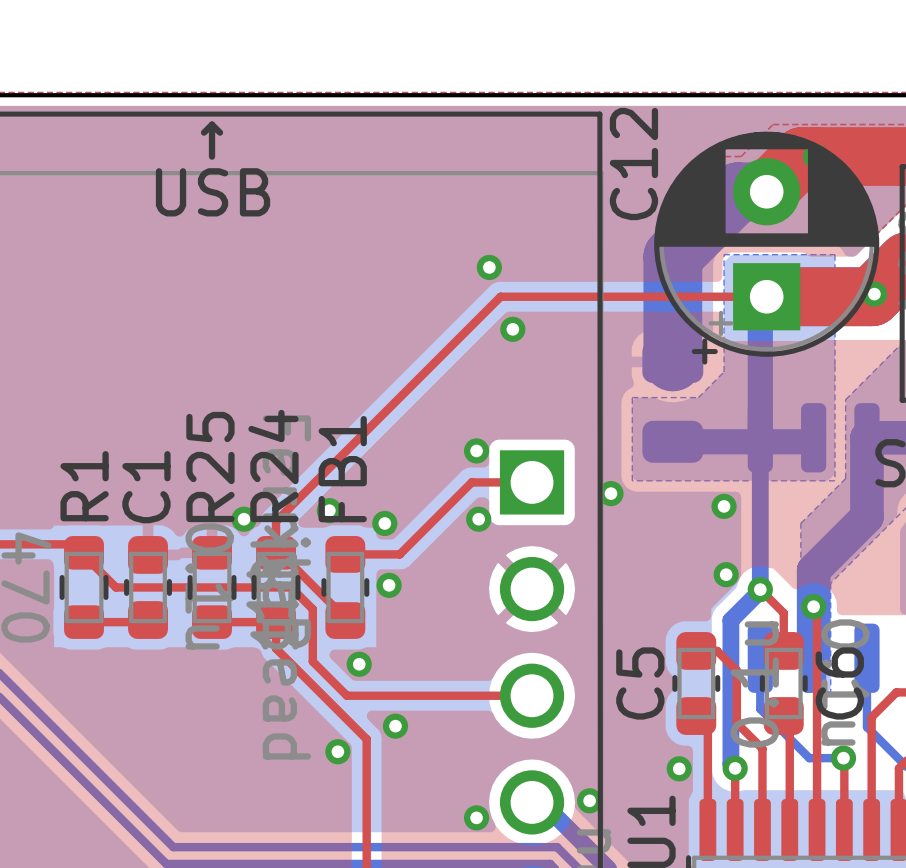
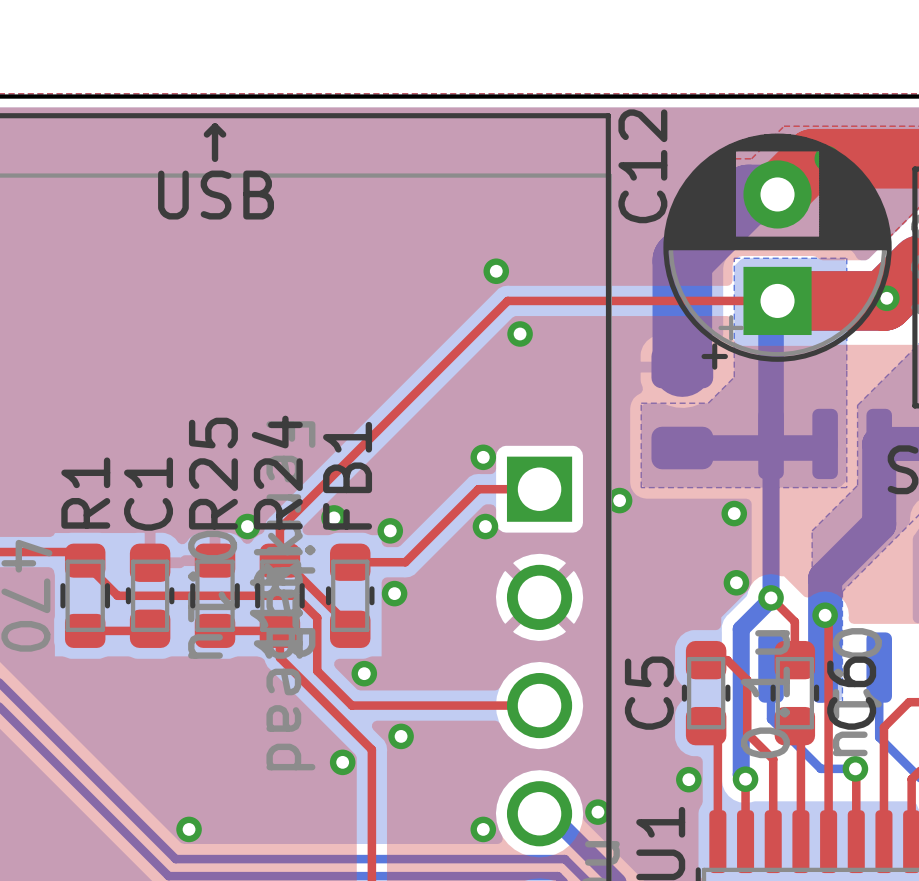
via: none -> (189, 829)

